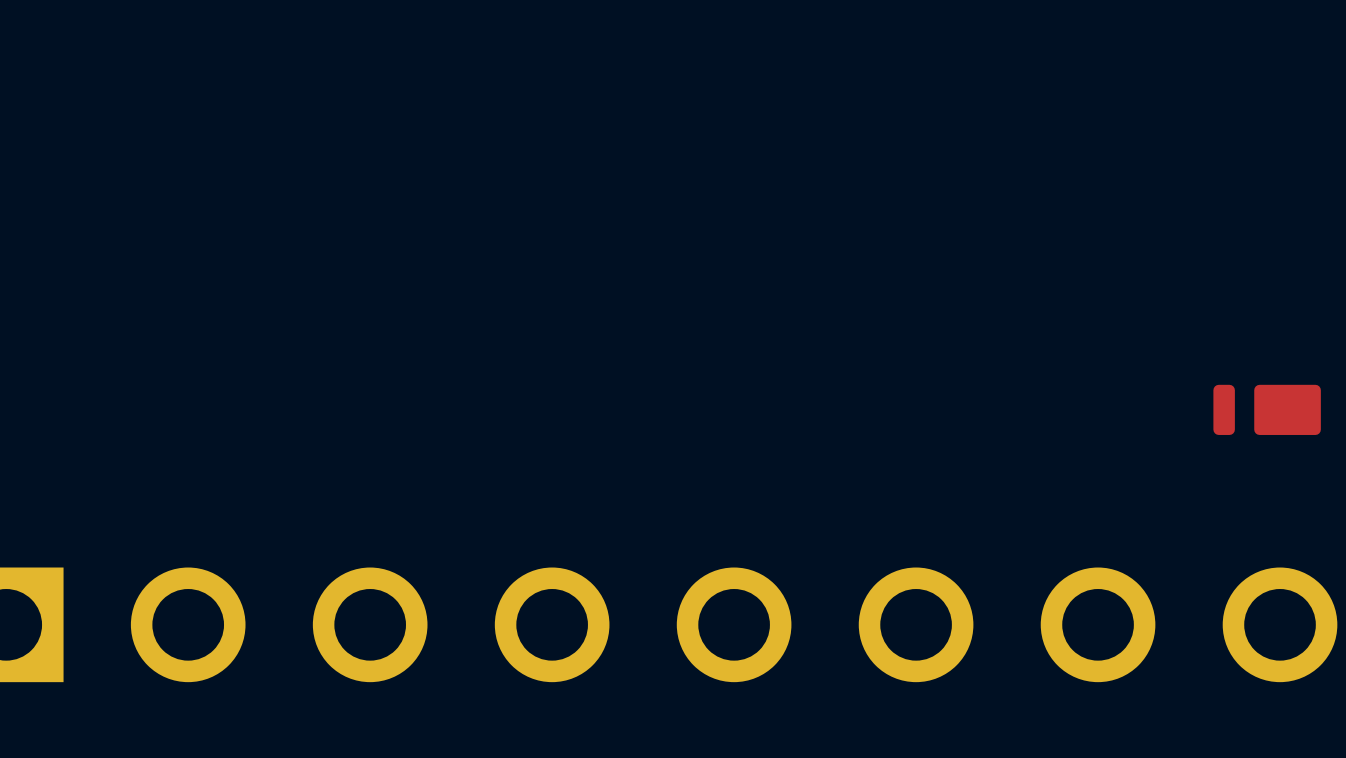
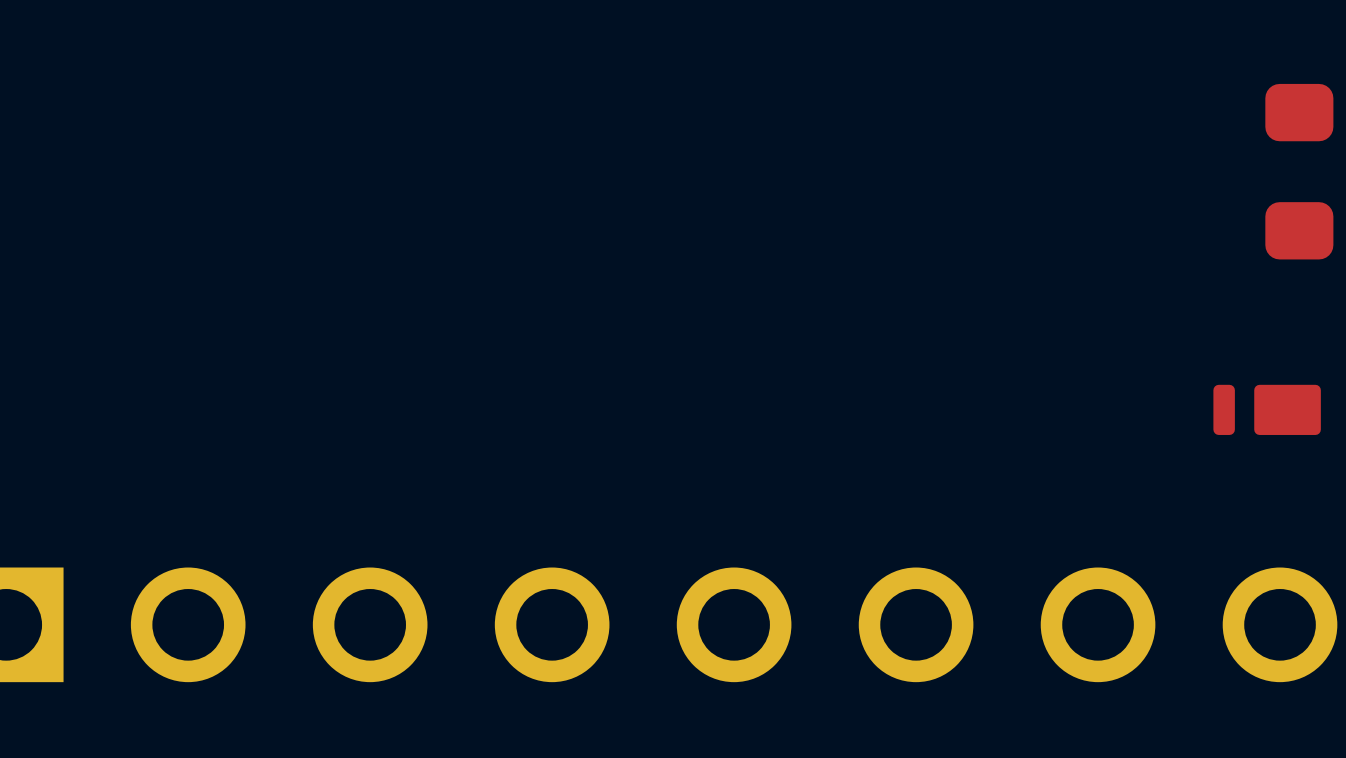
part: none -> (1299, 171)

